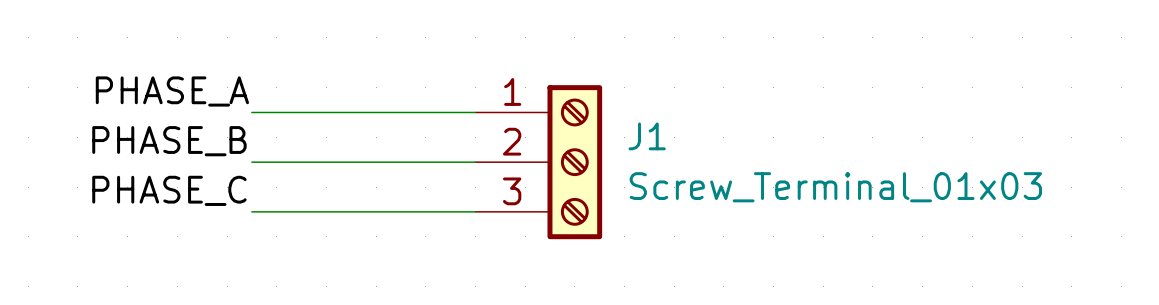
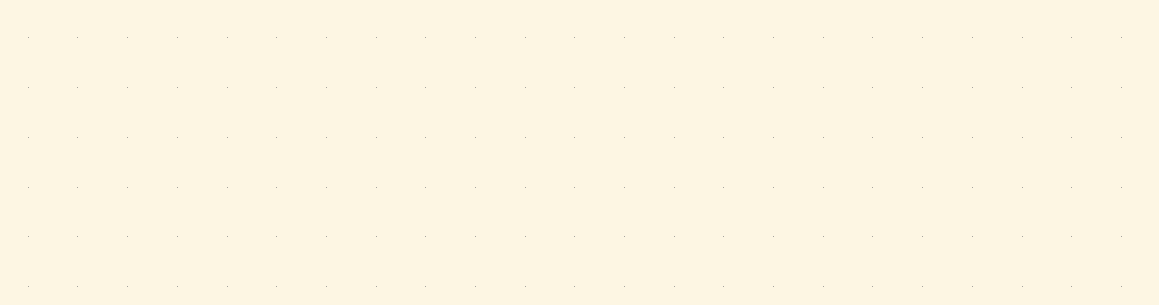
label: PHASE_A (172, 91) -> none
wire: (251, 112) (475, 112) -> none
label: PHASE_B (169, 141) -> none
wire: (251, 162) (475, 162) -> none
J1: Screw_Terminal_01x03 (538, 162) -> none
label: PHASE_C (169, 190) -> none
wire: (251, 211) (475, 211) -> none

